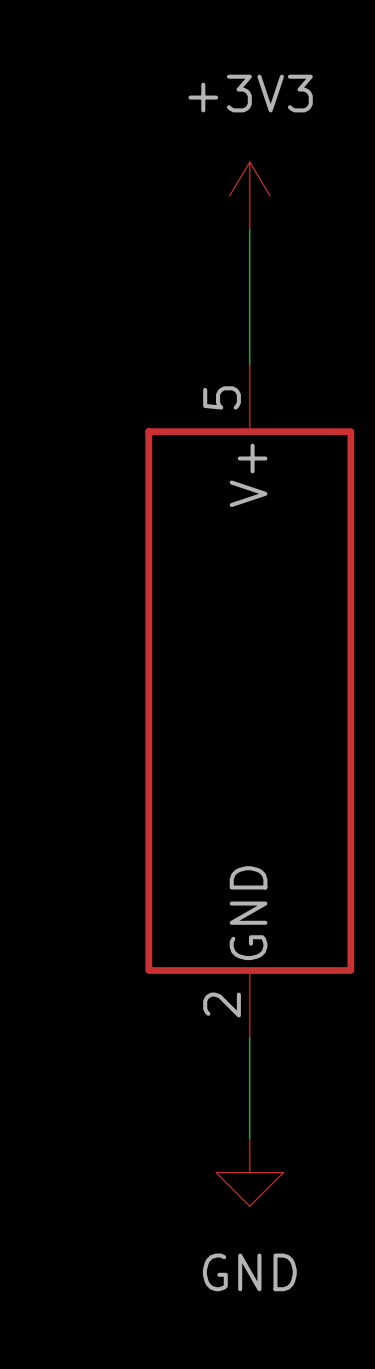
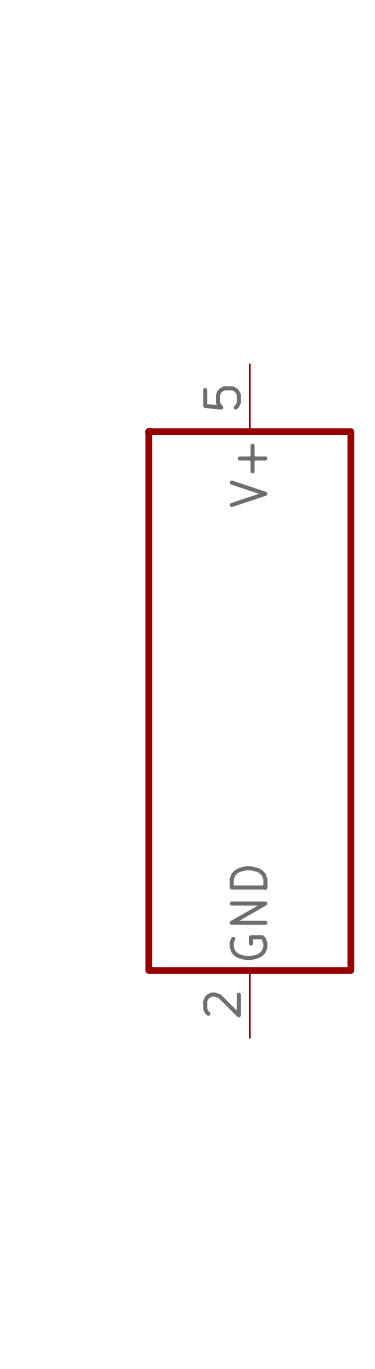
power symbol: +3V3 (249, 195) -> none
wire: (249, 229) (249, 364) -> none
wire: (249, 1037) (249, 1138) -> none
power symbol: GND (249, 1172) -> none

